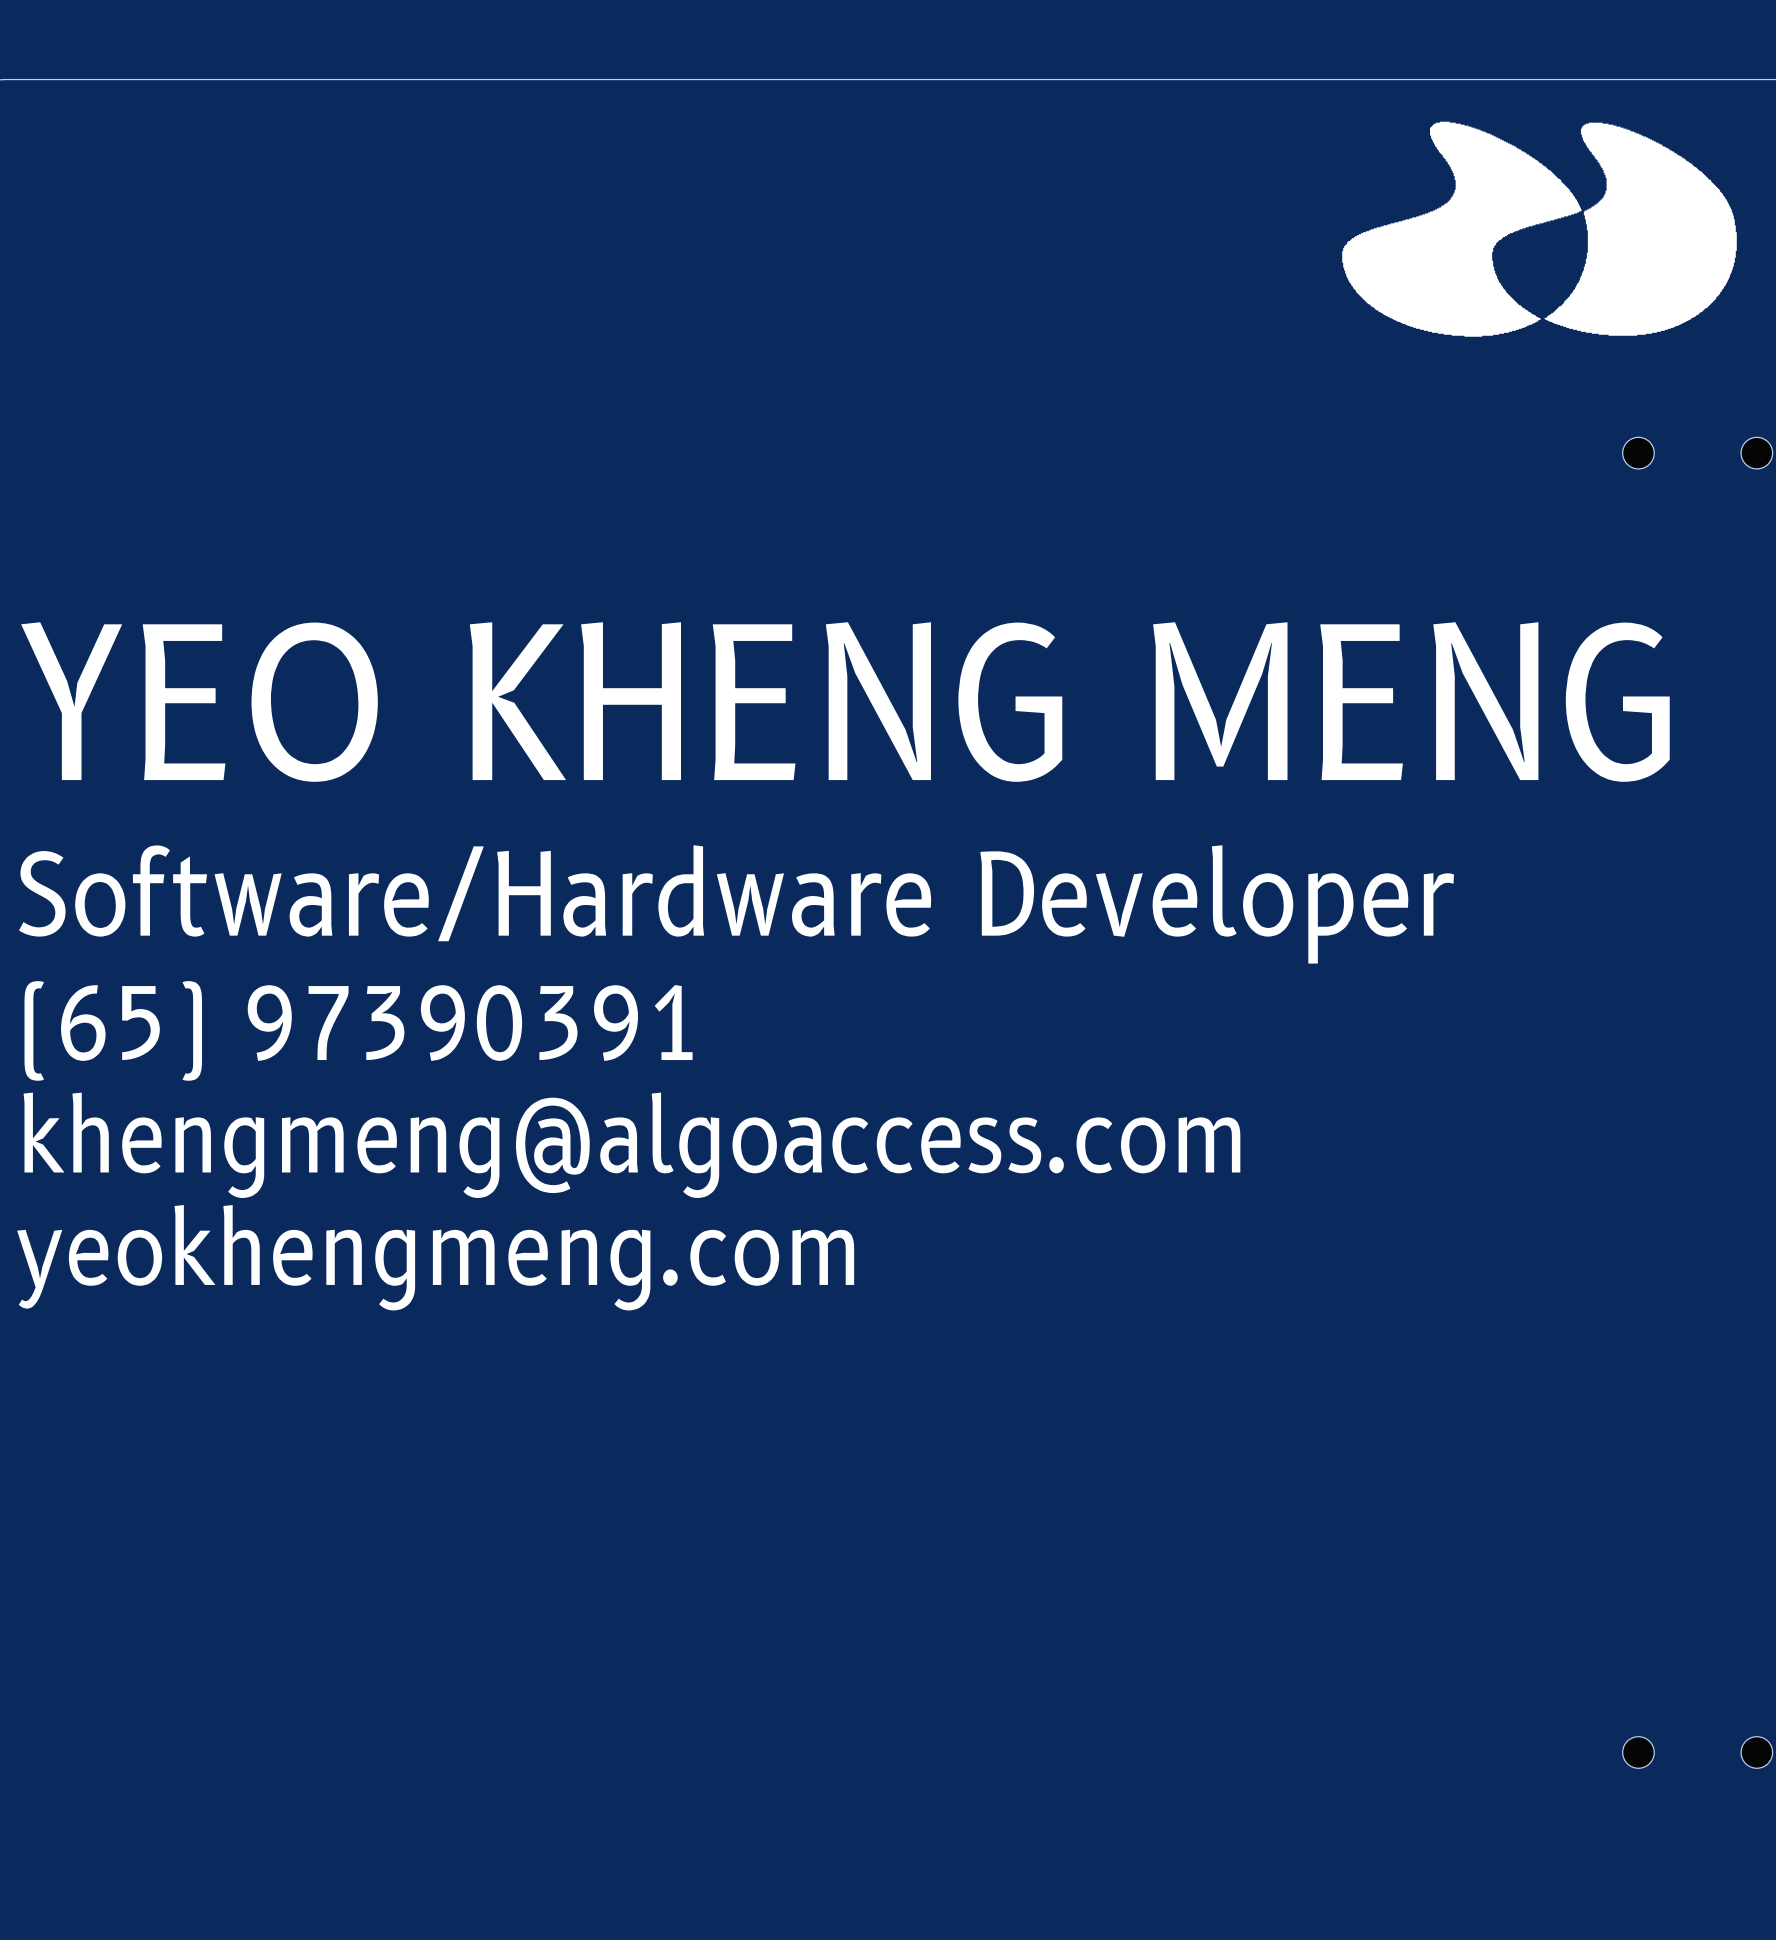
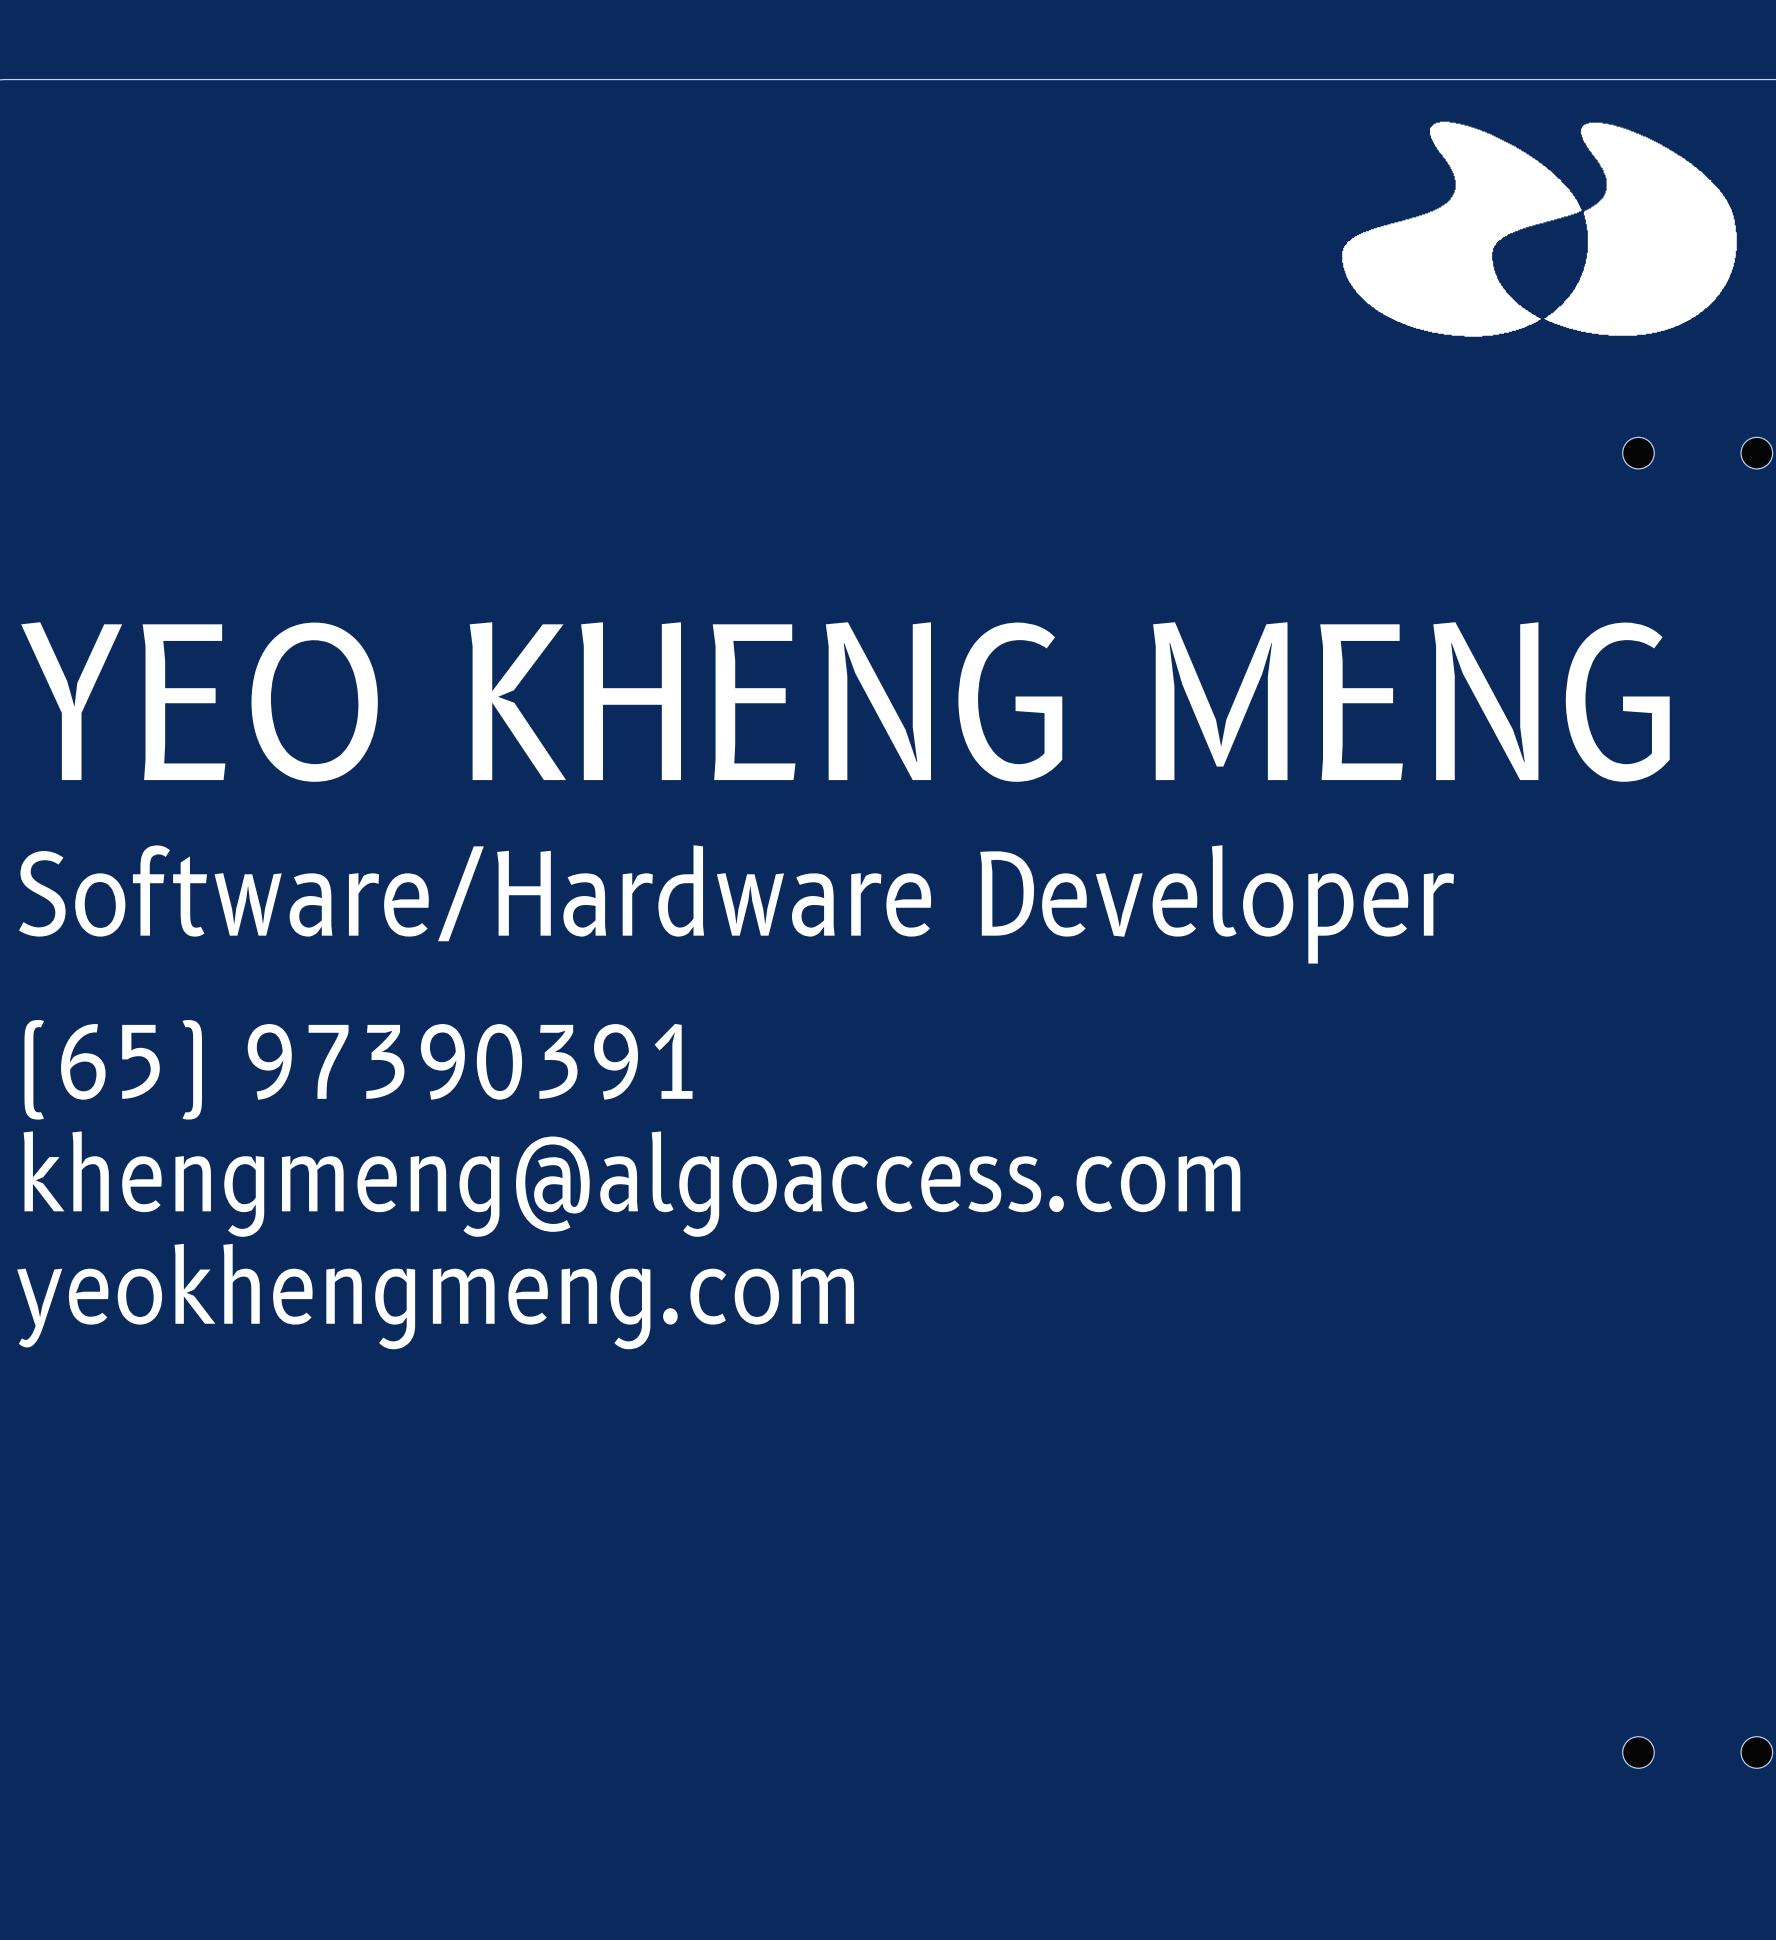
text position: (65) 97390391 (358, 1030) -> (65) 97390391 (358, 1069)
text position: khengmeng@algoaccess.com (631, 1145) -> khengmeng@algoaccess.com (631, 1184)
text position: yeokhengmeng.com (435, 1257) -> yeokhengmeng.com (435, 1296)

